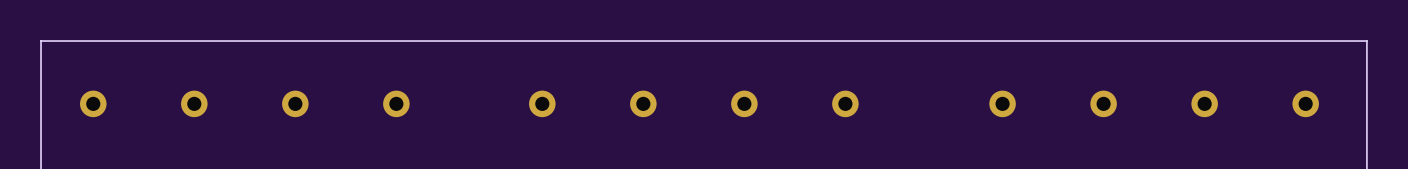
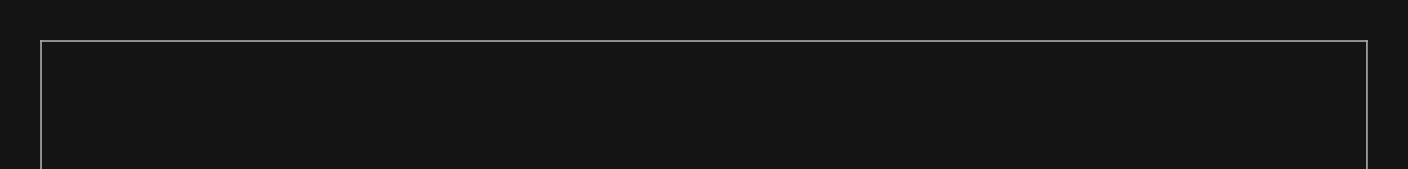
via: (93, 103) -> none
via: (194, 103) -> none
via: (295, 103) -> none
via: (396, 103) -> none
via: (542, 103) -> none
via: (643, 103) -> none
via: (744, 103) -> none
via: (845, 103) -> none
via: (1002, 103) -> none
via: (1103, 103) -> none
via: (1204, 103) -> none
via: (1305, 103) -> none

